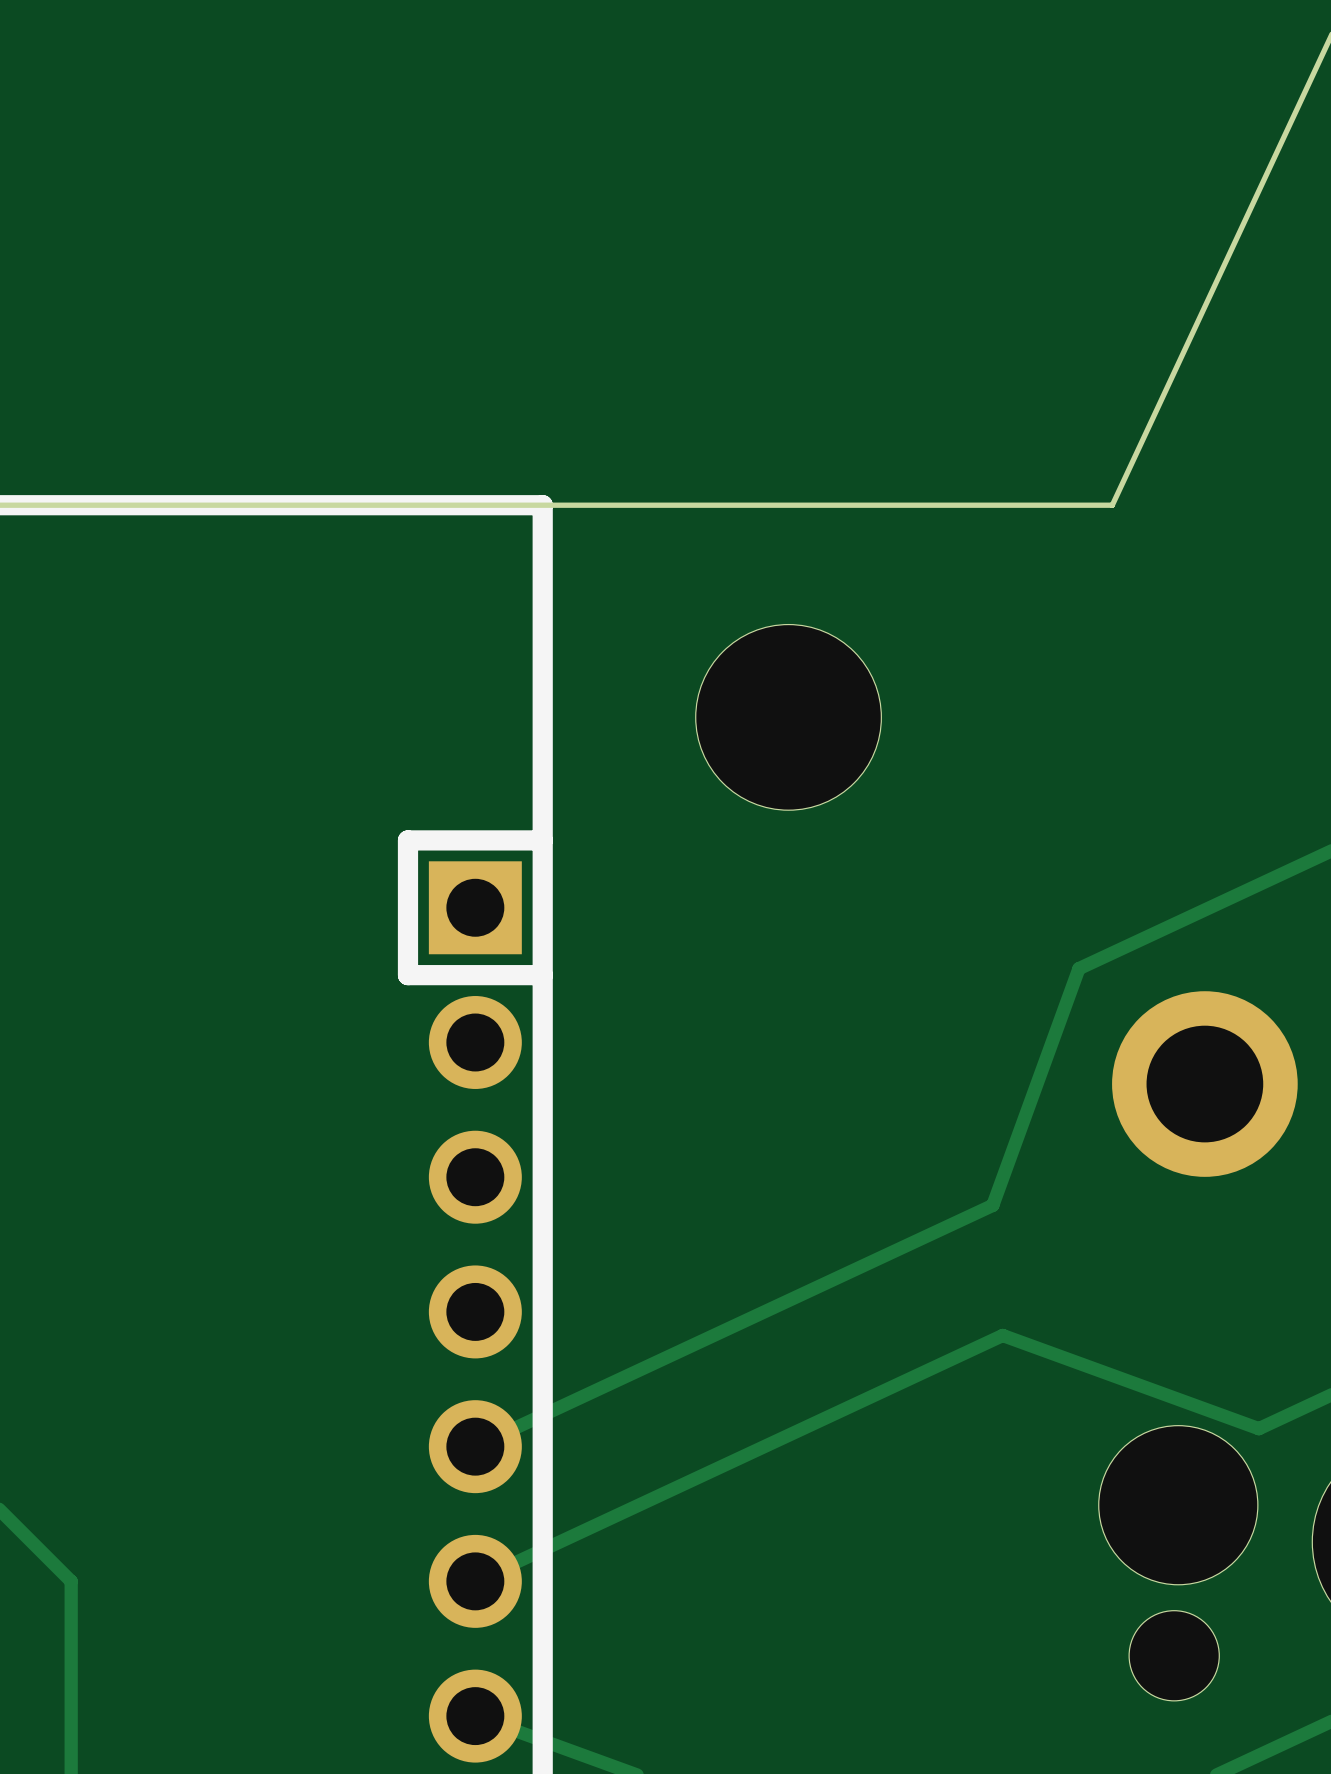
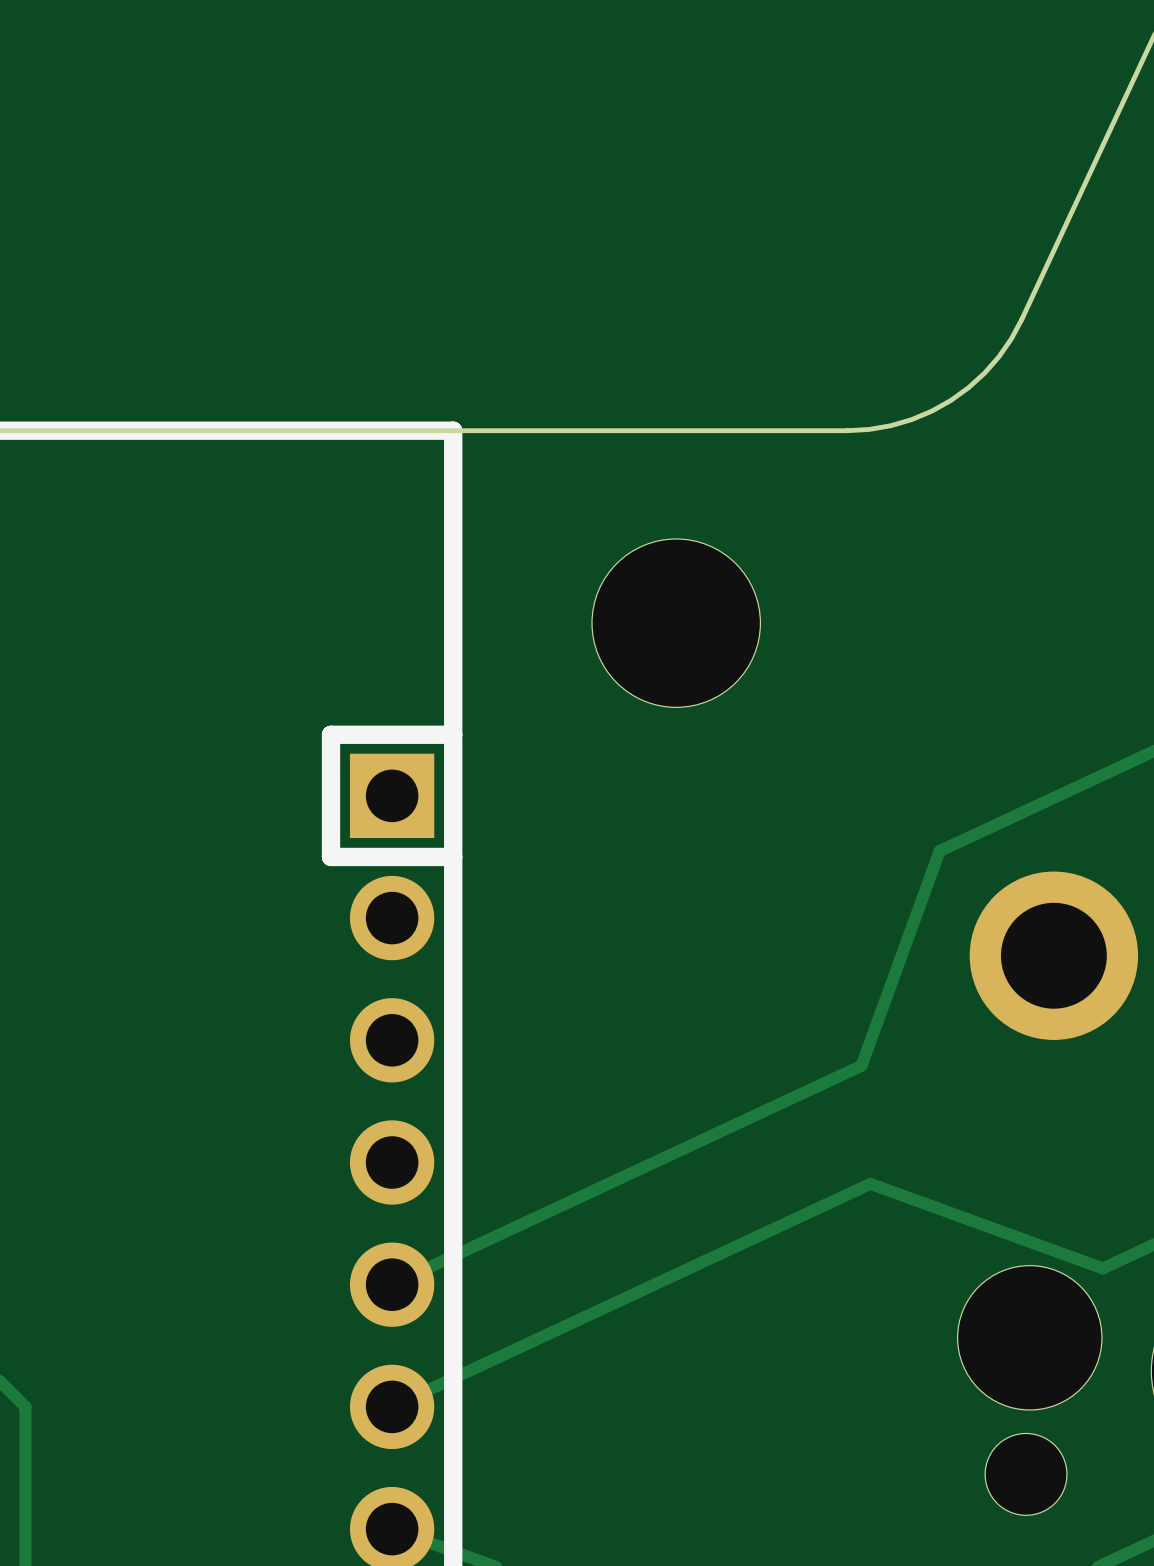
board edge: (1169, 382) (1112, 505) (977, 505) -> (1021, 319) (1011, 338) (984, 373) (950, 400) (911, 419) (890, 425) (847, 430)

